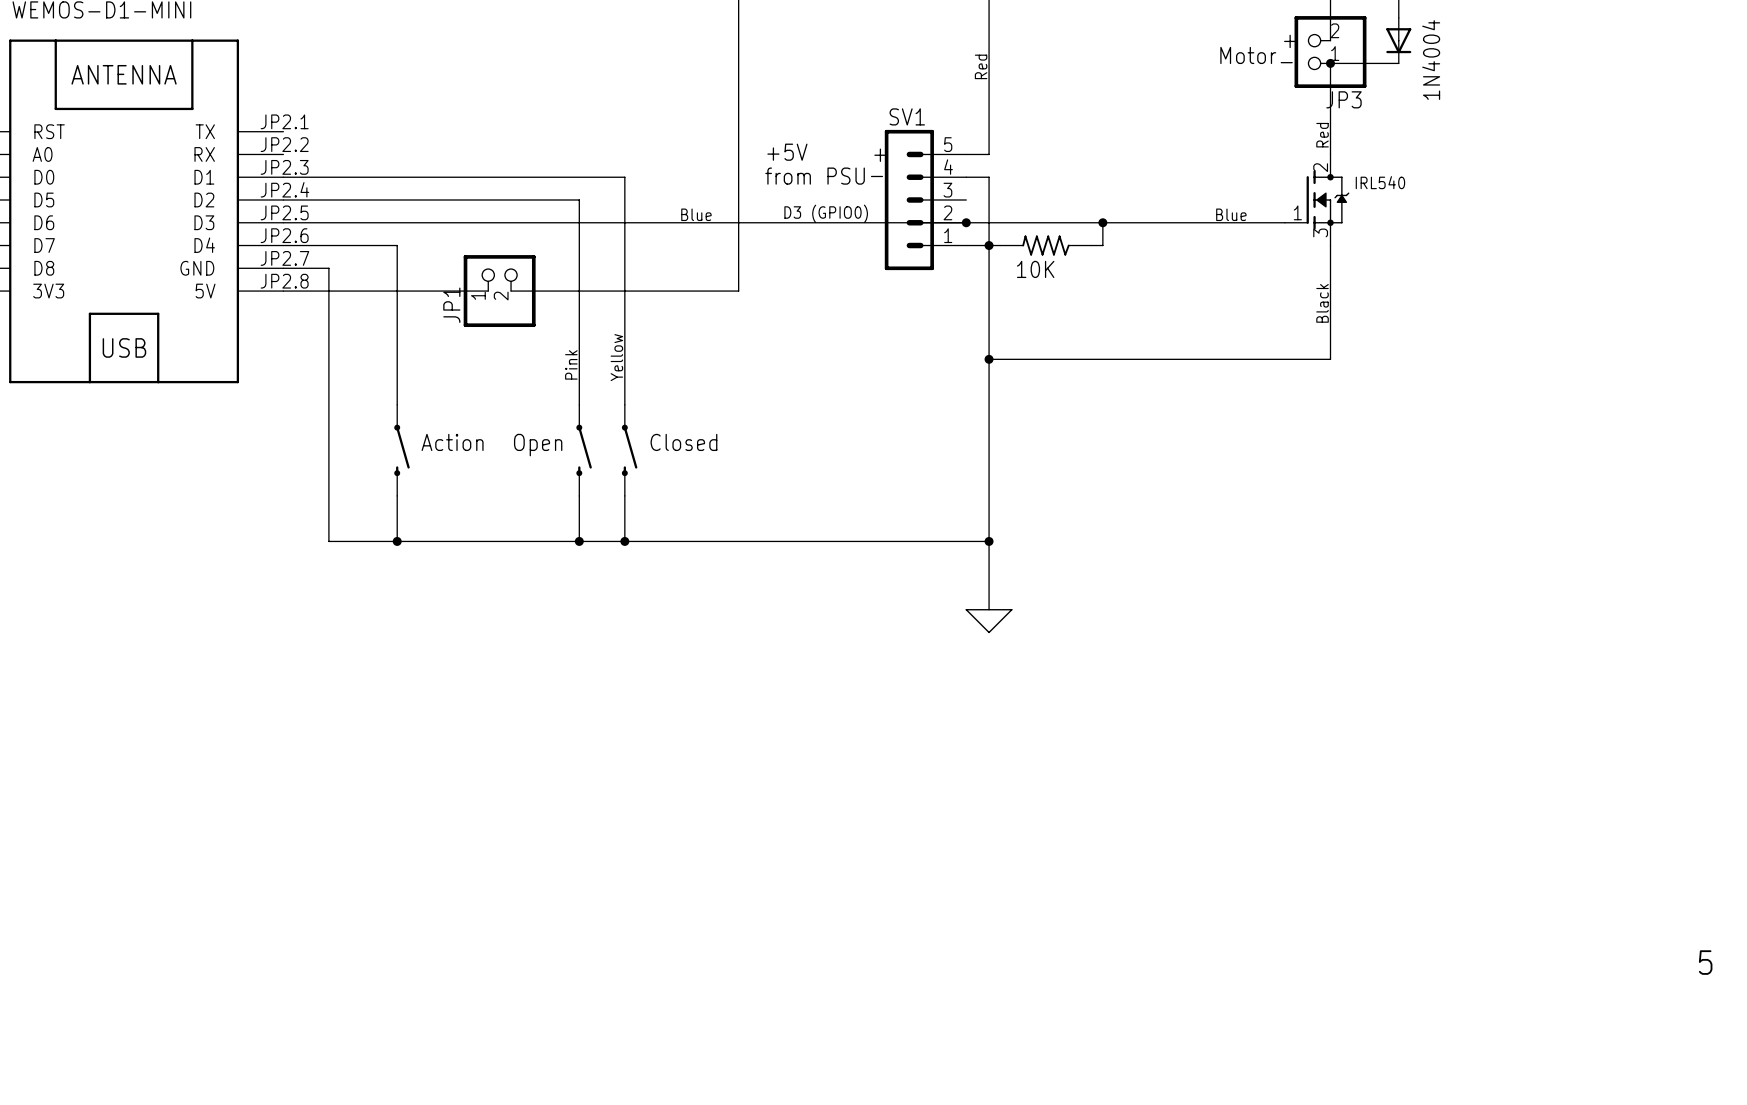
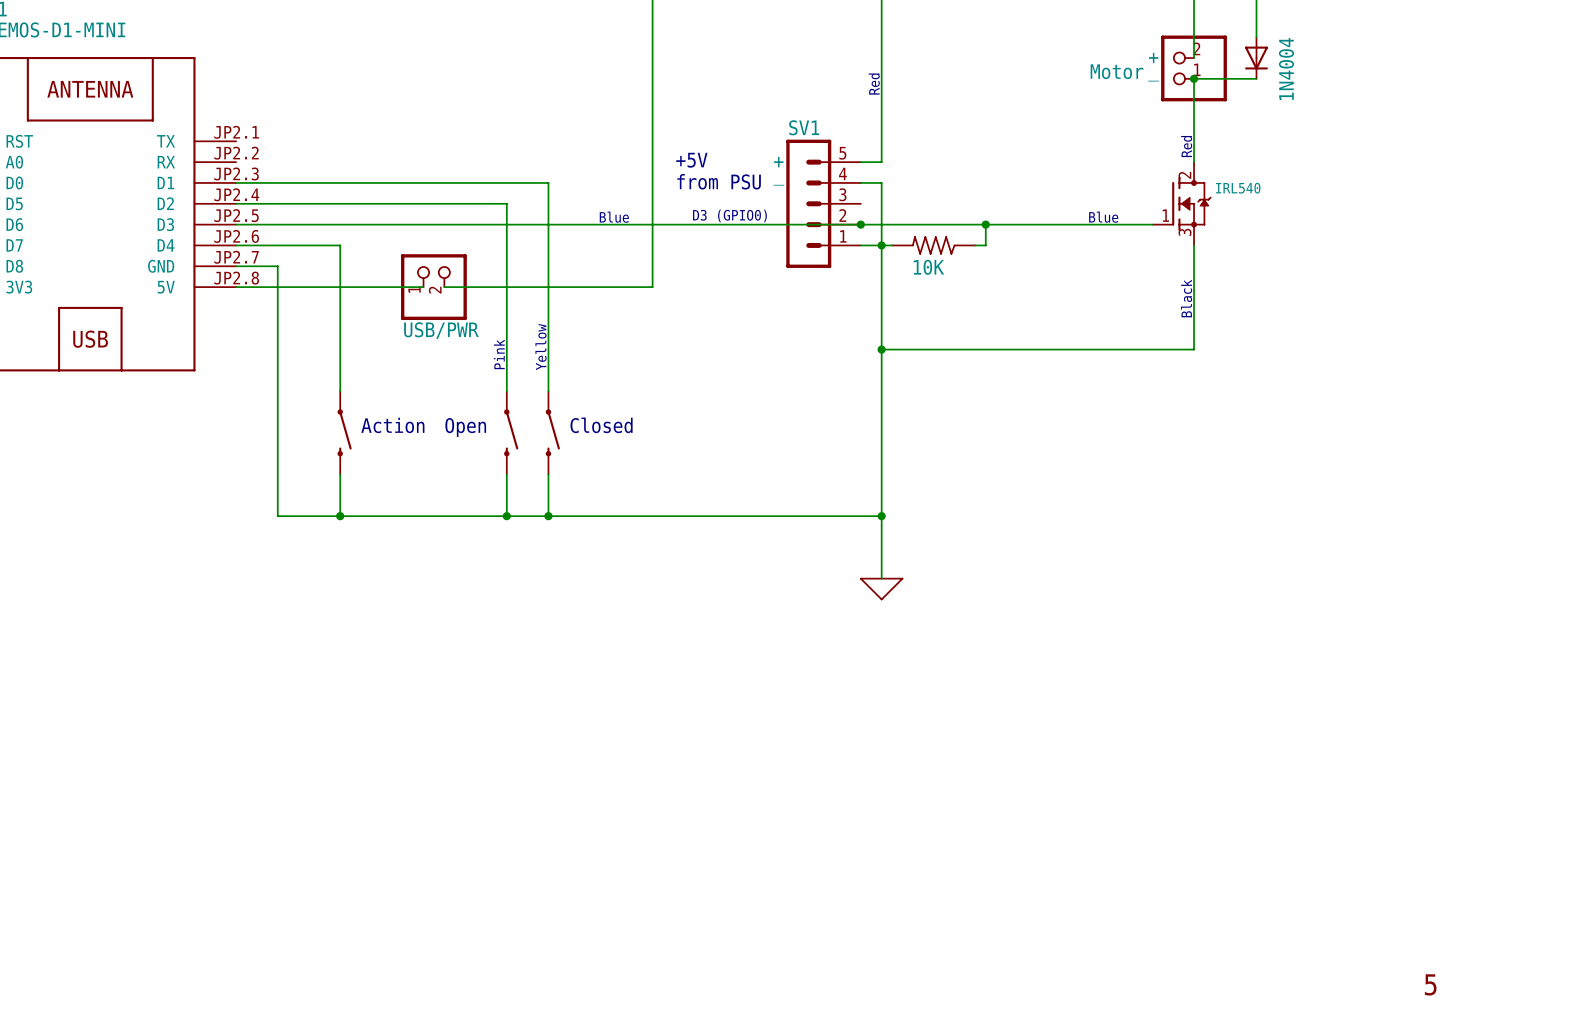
JP3 name: JP3 (1344, 99) -> none
JP1 name: JP1 (451, 305) -> USB/PWR (441, 330)
text position: 5 (1705, 962) -> 5 (1430, 984)

